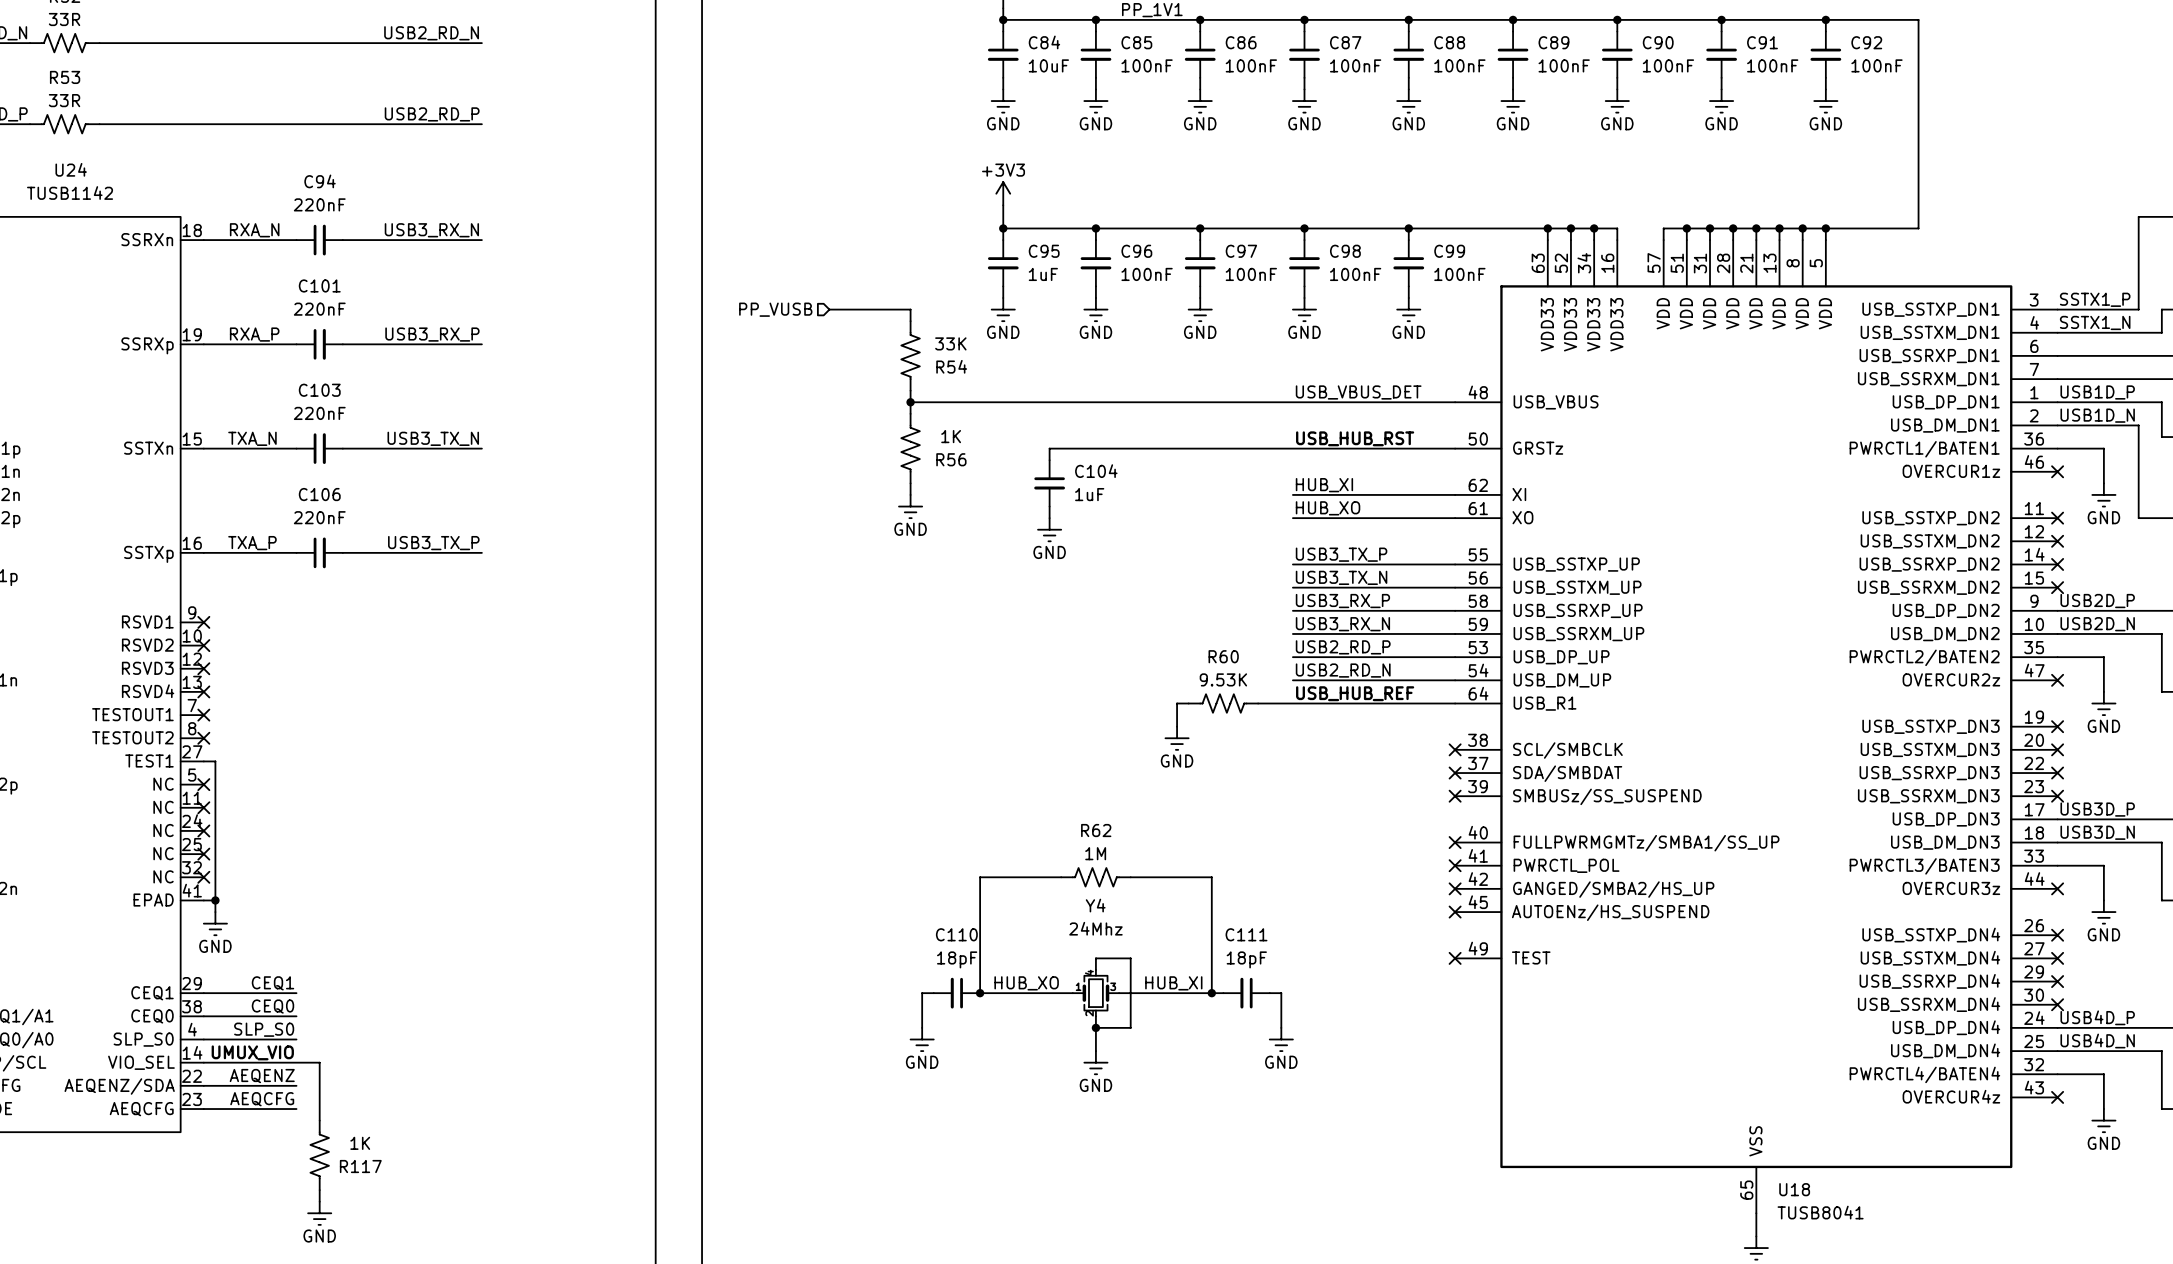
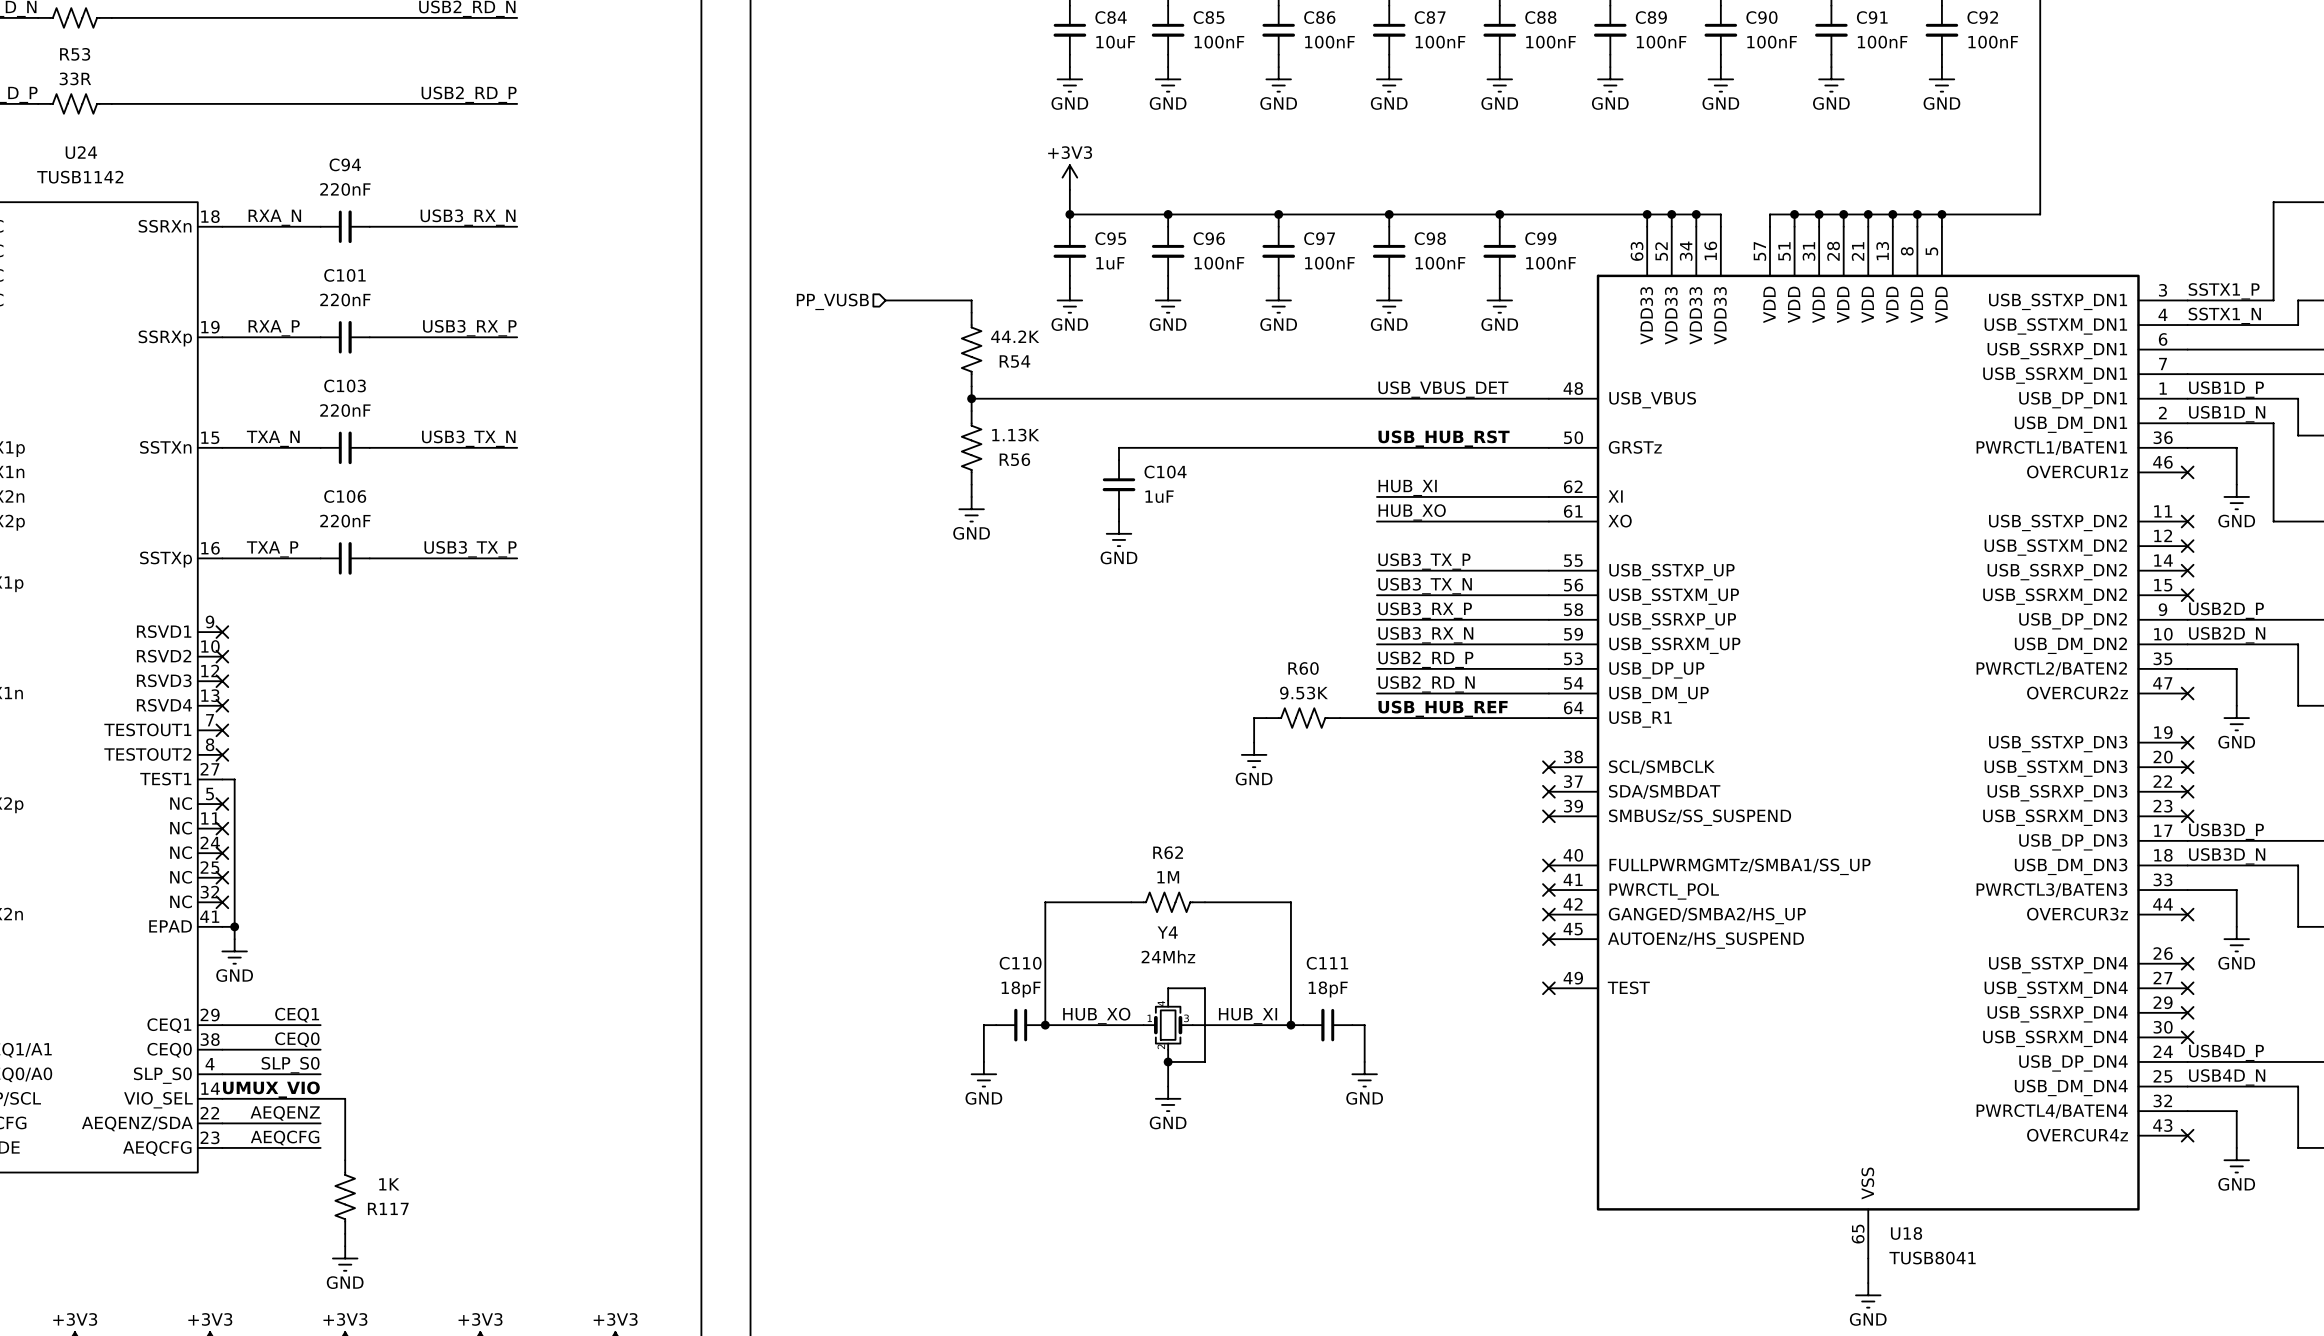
R54 value: 33K (950, 343) -> 44.2K (1015, 336)
R56 value: 1K (951, 436) -> 1.13K (1015, 435)

